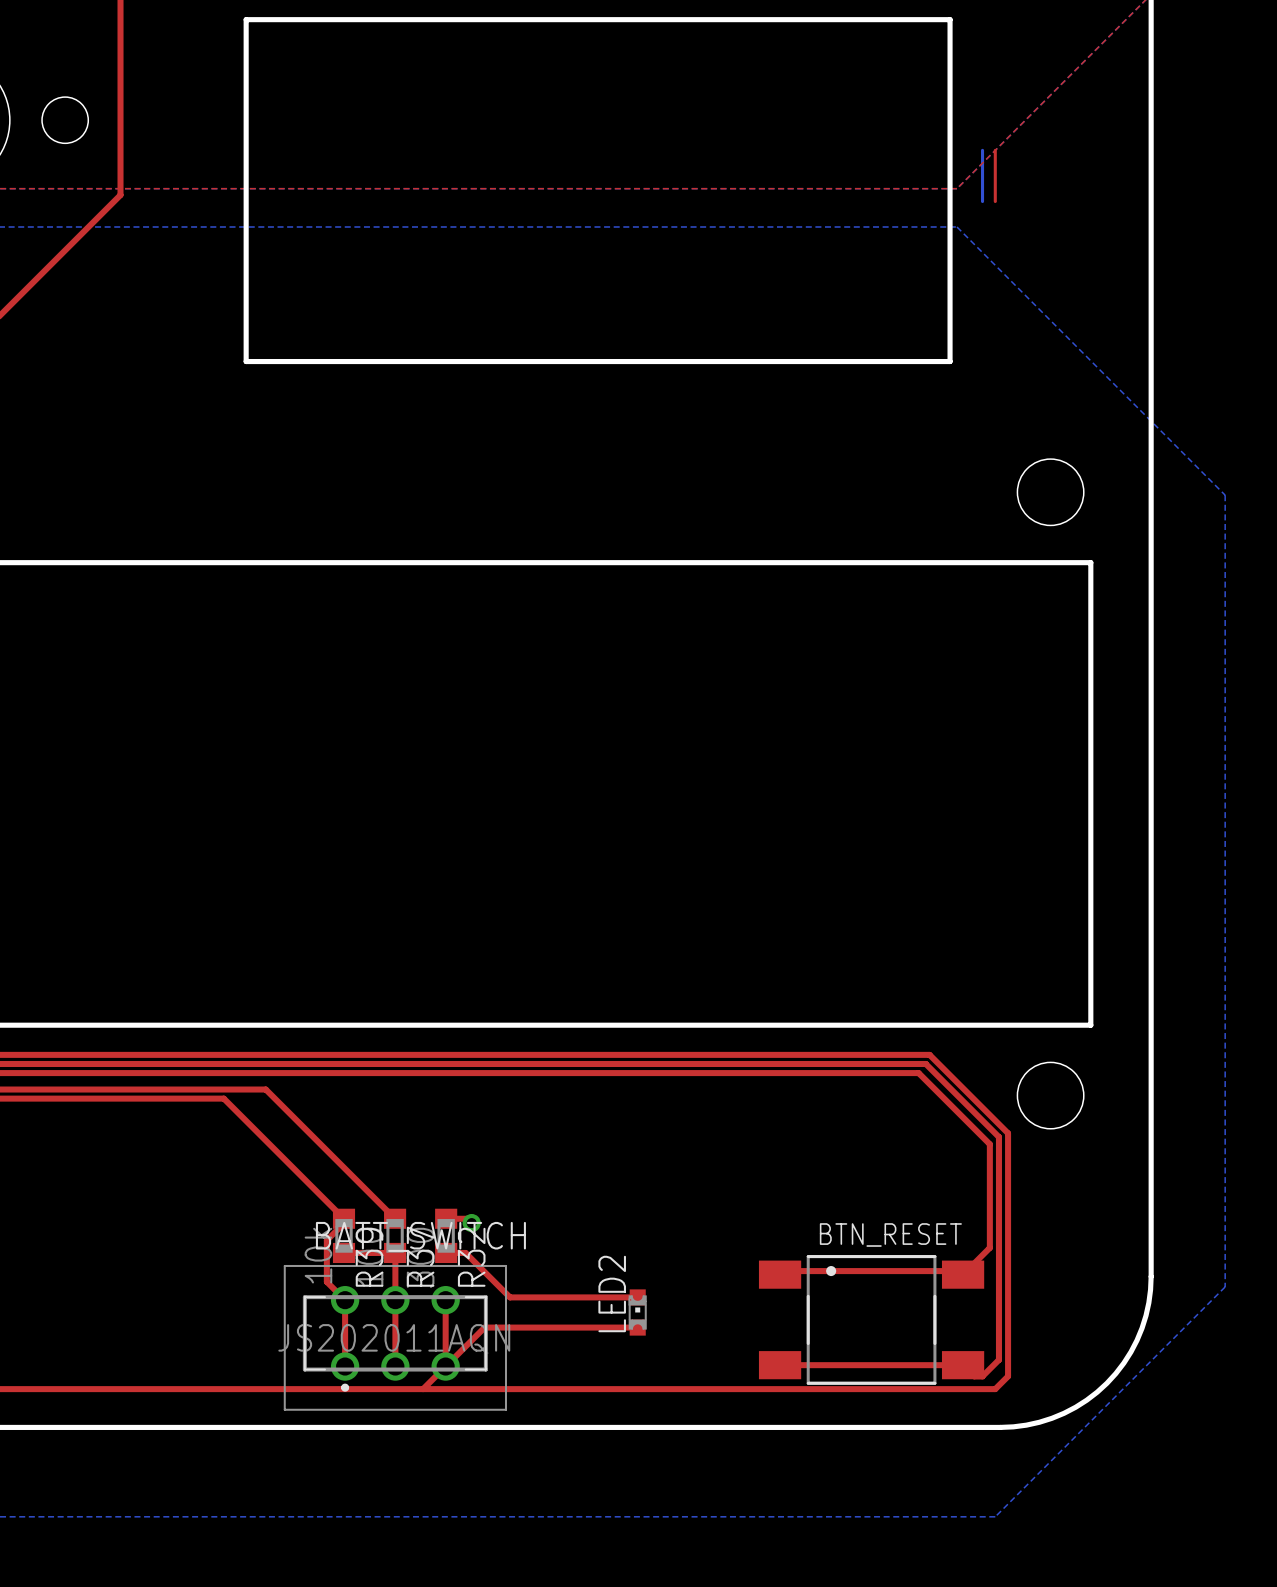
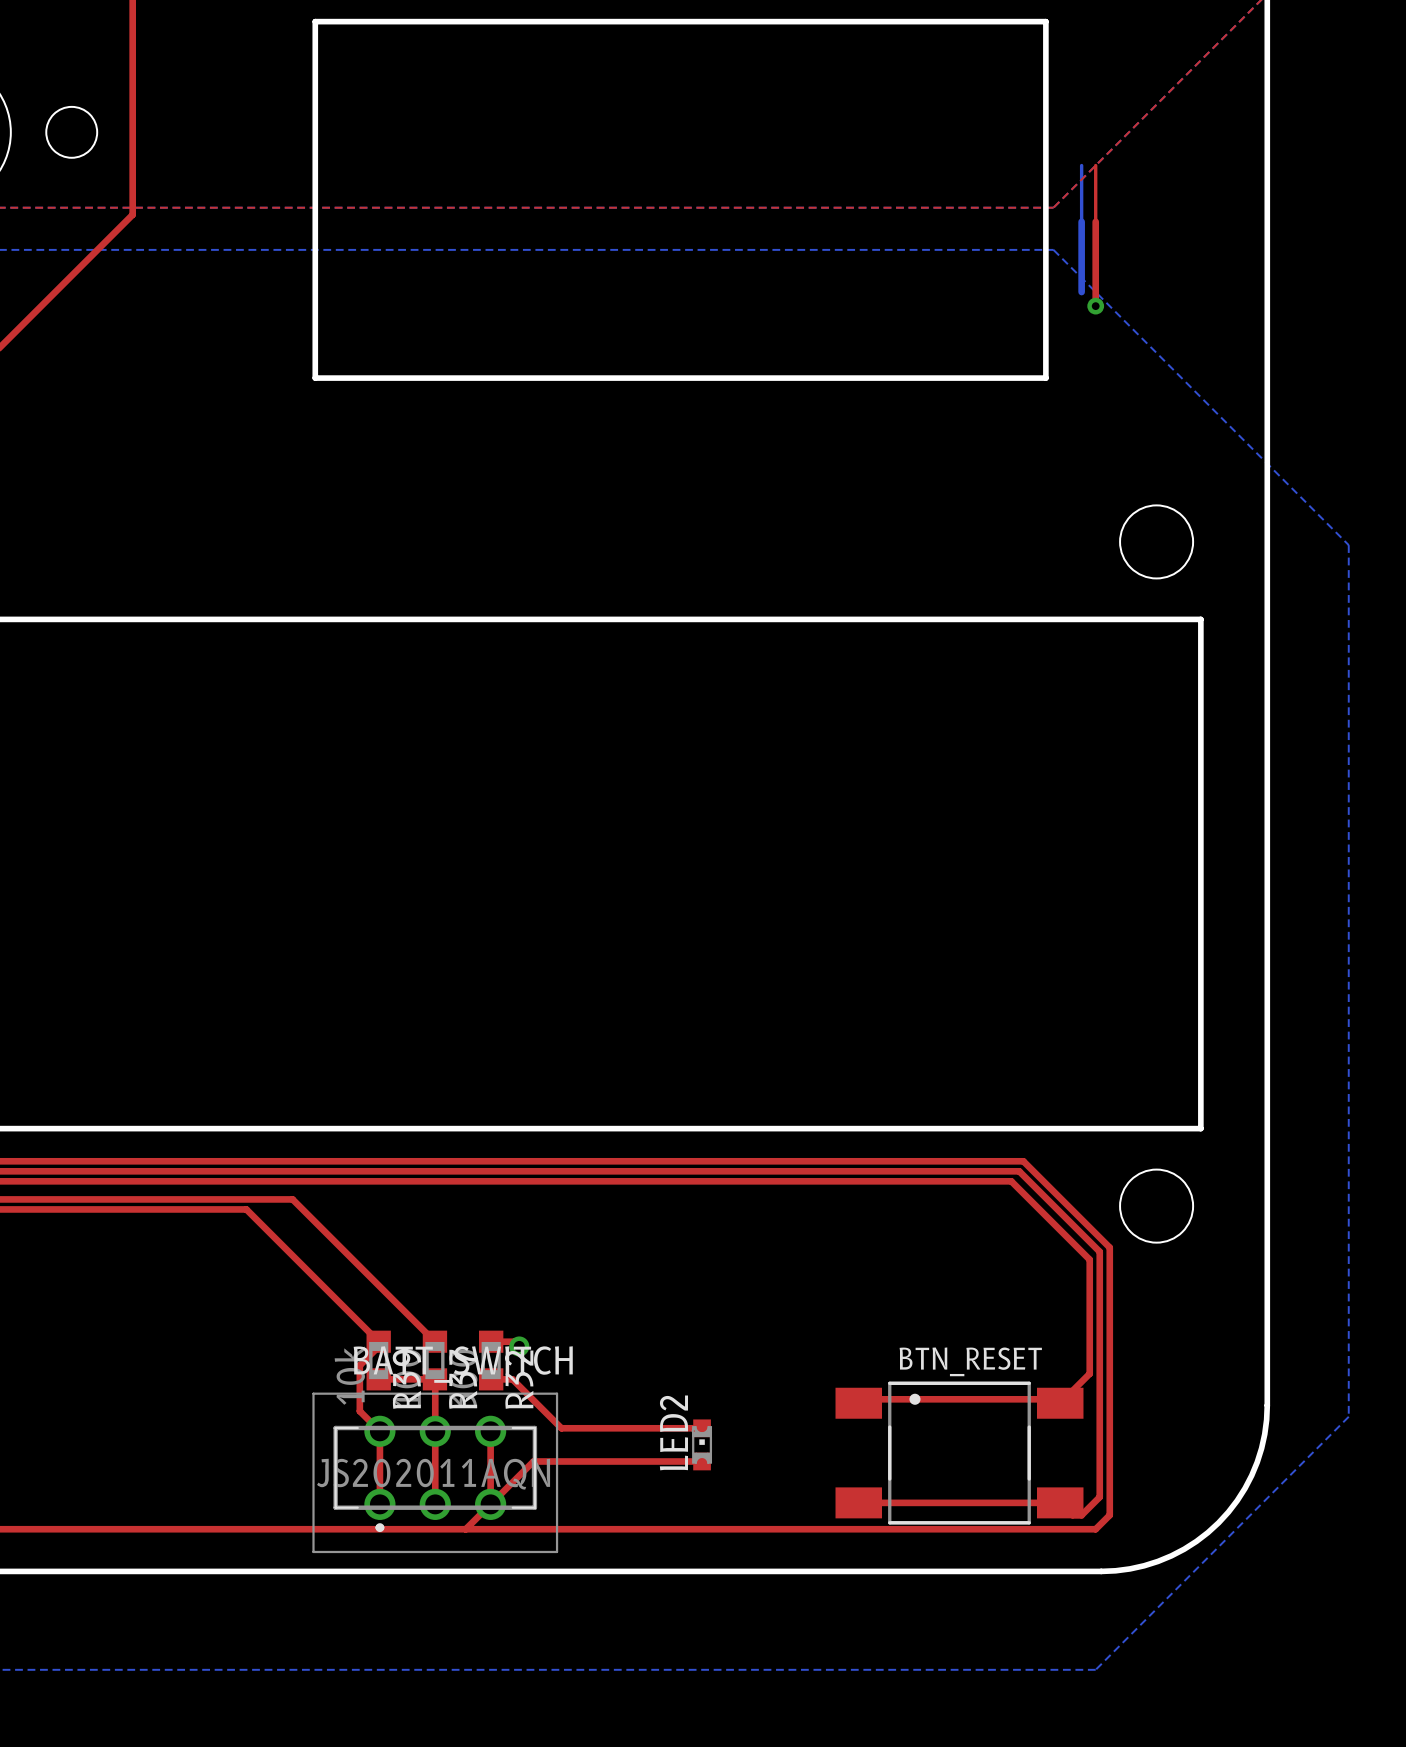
board edge: (286, 19) (246, 19) (246, 361) (950, 361) (950, 343) -> (315, 21) (315, 378) (1045, 378)
bottom track: none -> (1081, 221) (1081, 292)
top track: none -> (1095, 221) (1095, 306)
via: none -> (1095, 306)

